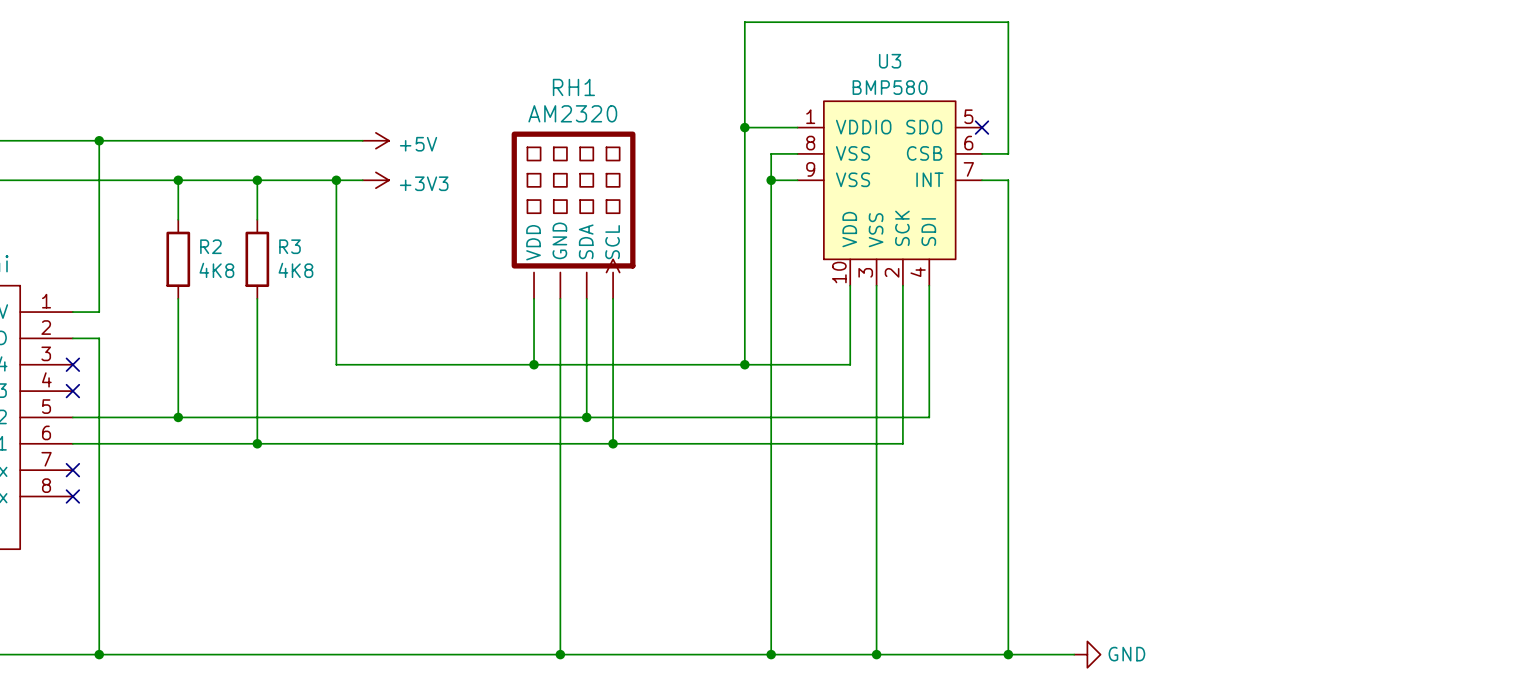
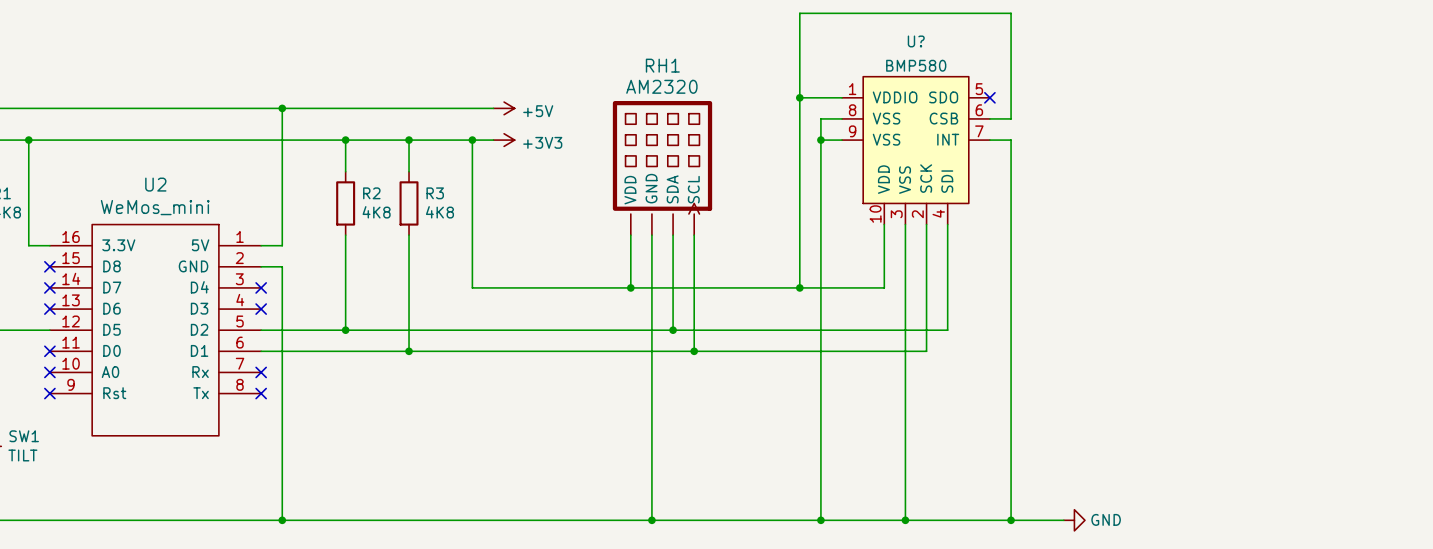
U3 name: U3 (890, 61) -> U? (916, 41)

